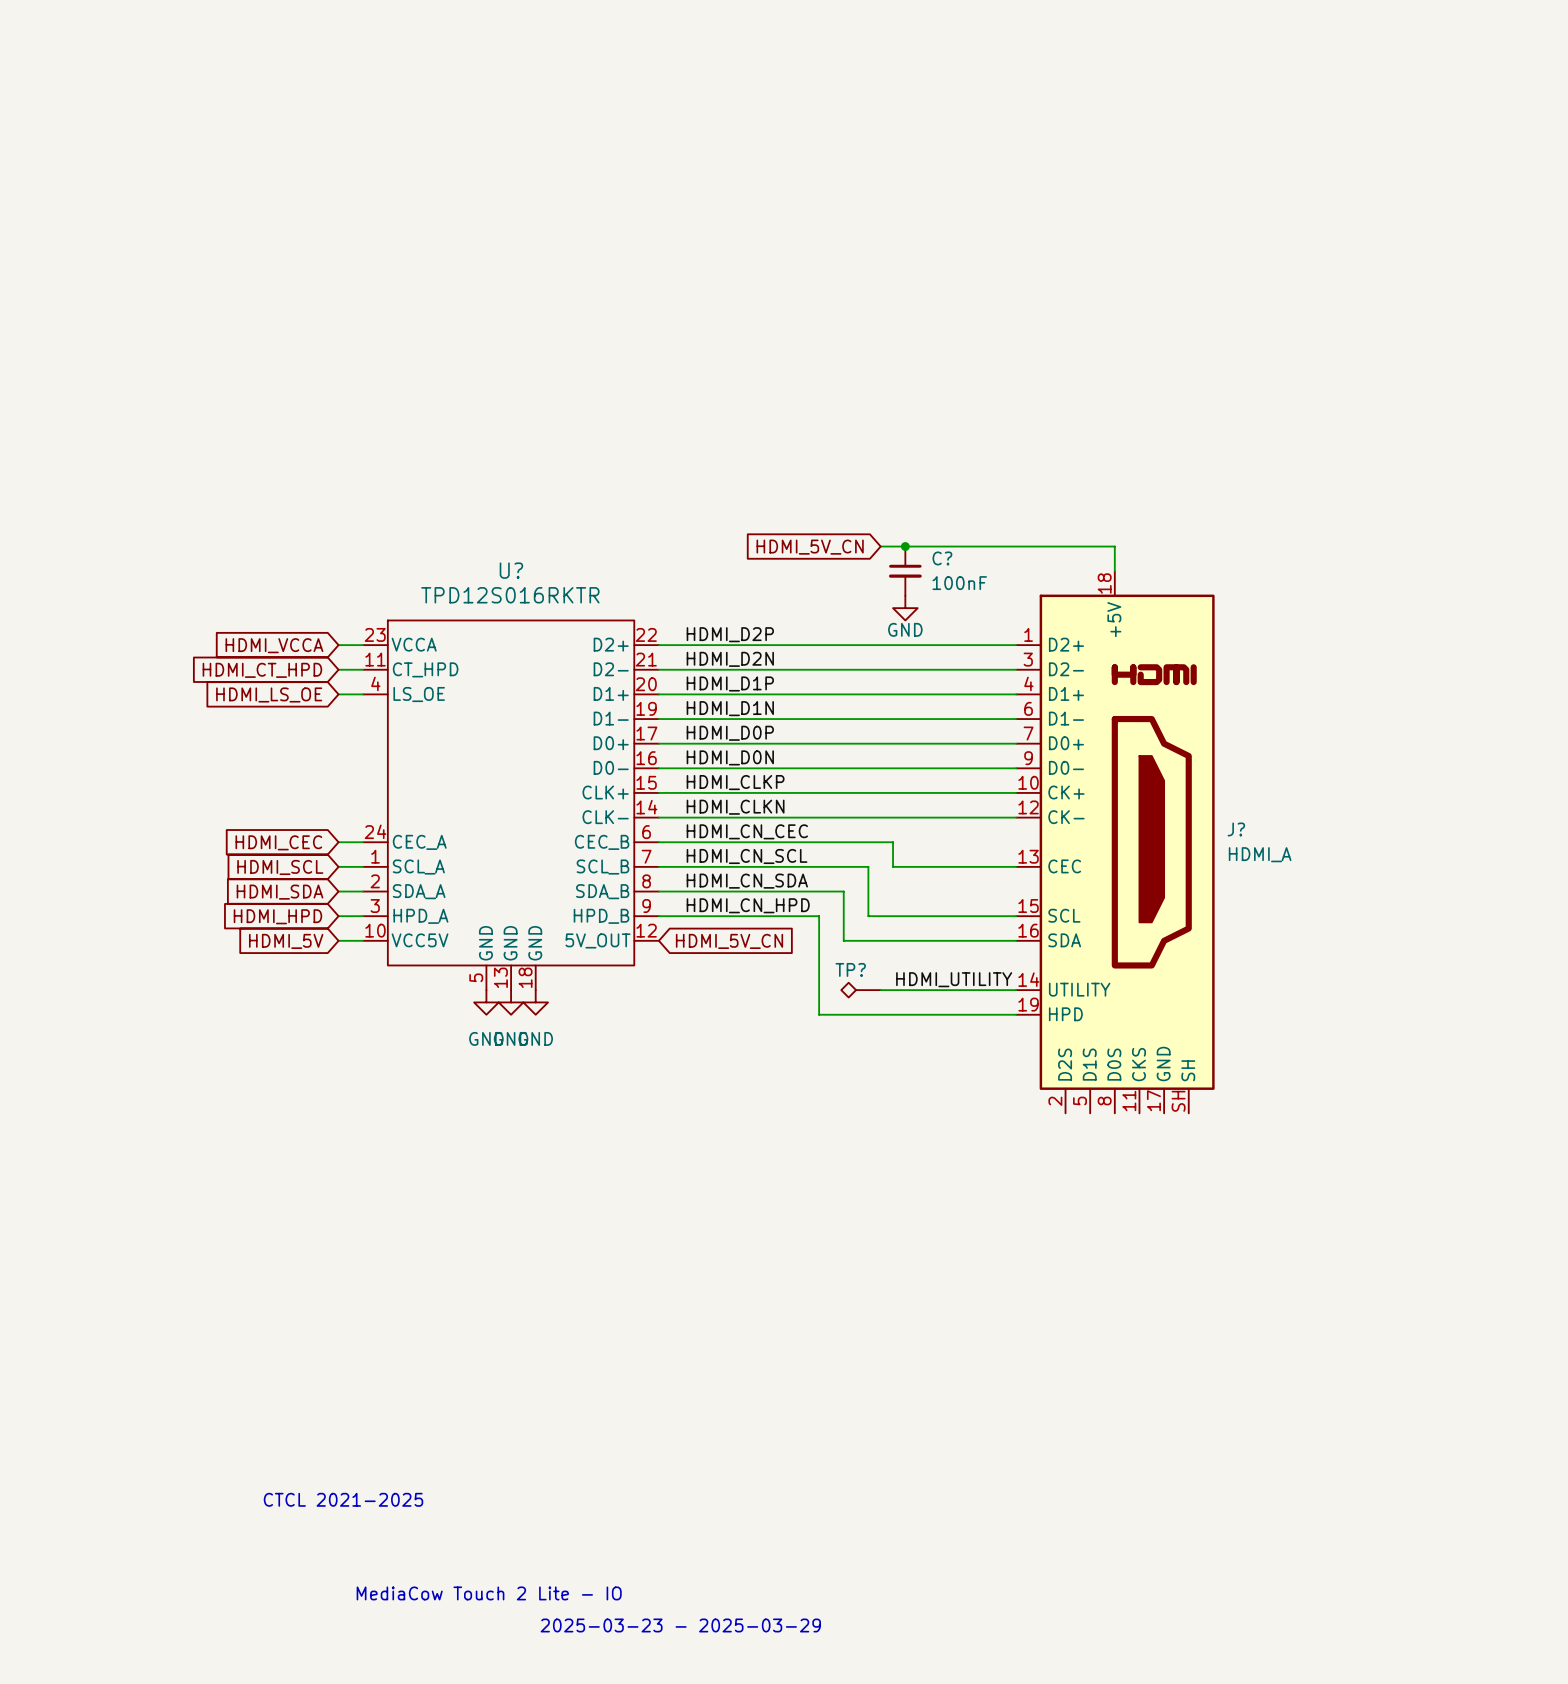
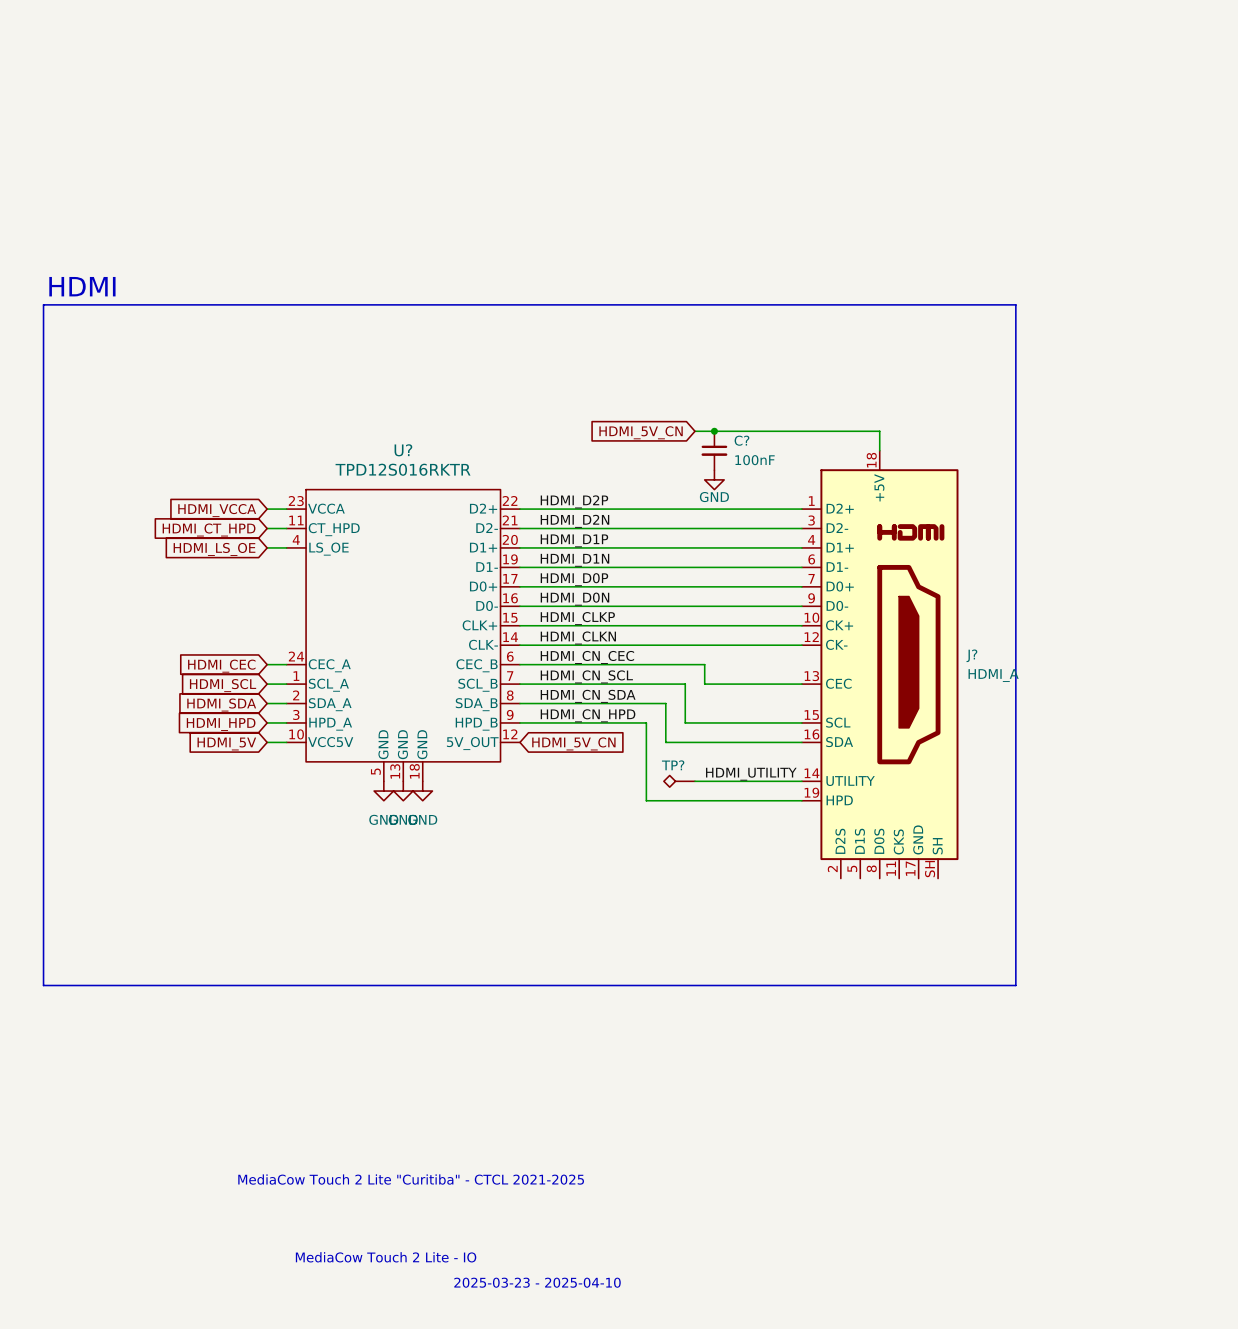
text: none -> HDMI (82, 286)
line: none -> (43, 304) (1015, 304) (1015, 985) (43, 985) (43, 304)
text: none -> MediaCow Touch 2 Lite "Curitiba" - CTCL 2021-2025 (411, 1179)
text: CTCL 2021-2025 (343, 1499) -> none
text: 2025-03-23 - 2025-03-29 (680, 1625) -> 2025-03-23 - 2025-04-10 (537, 1282)

